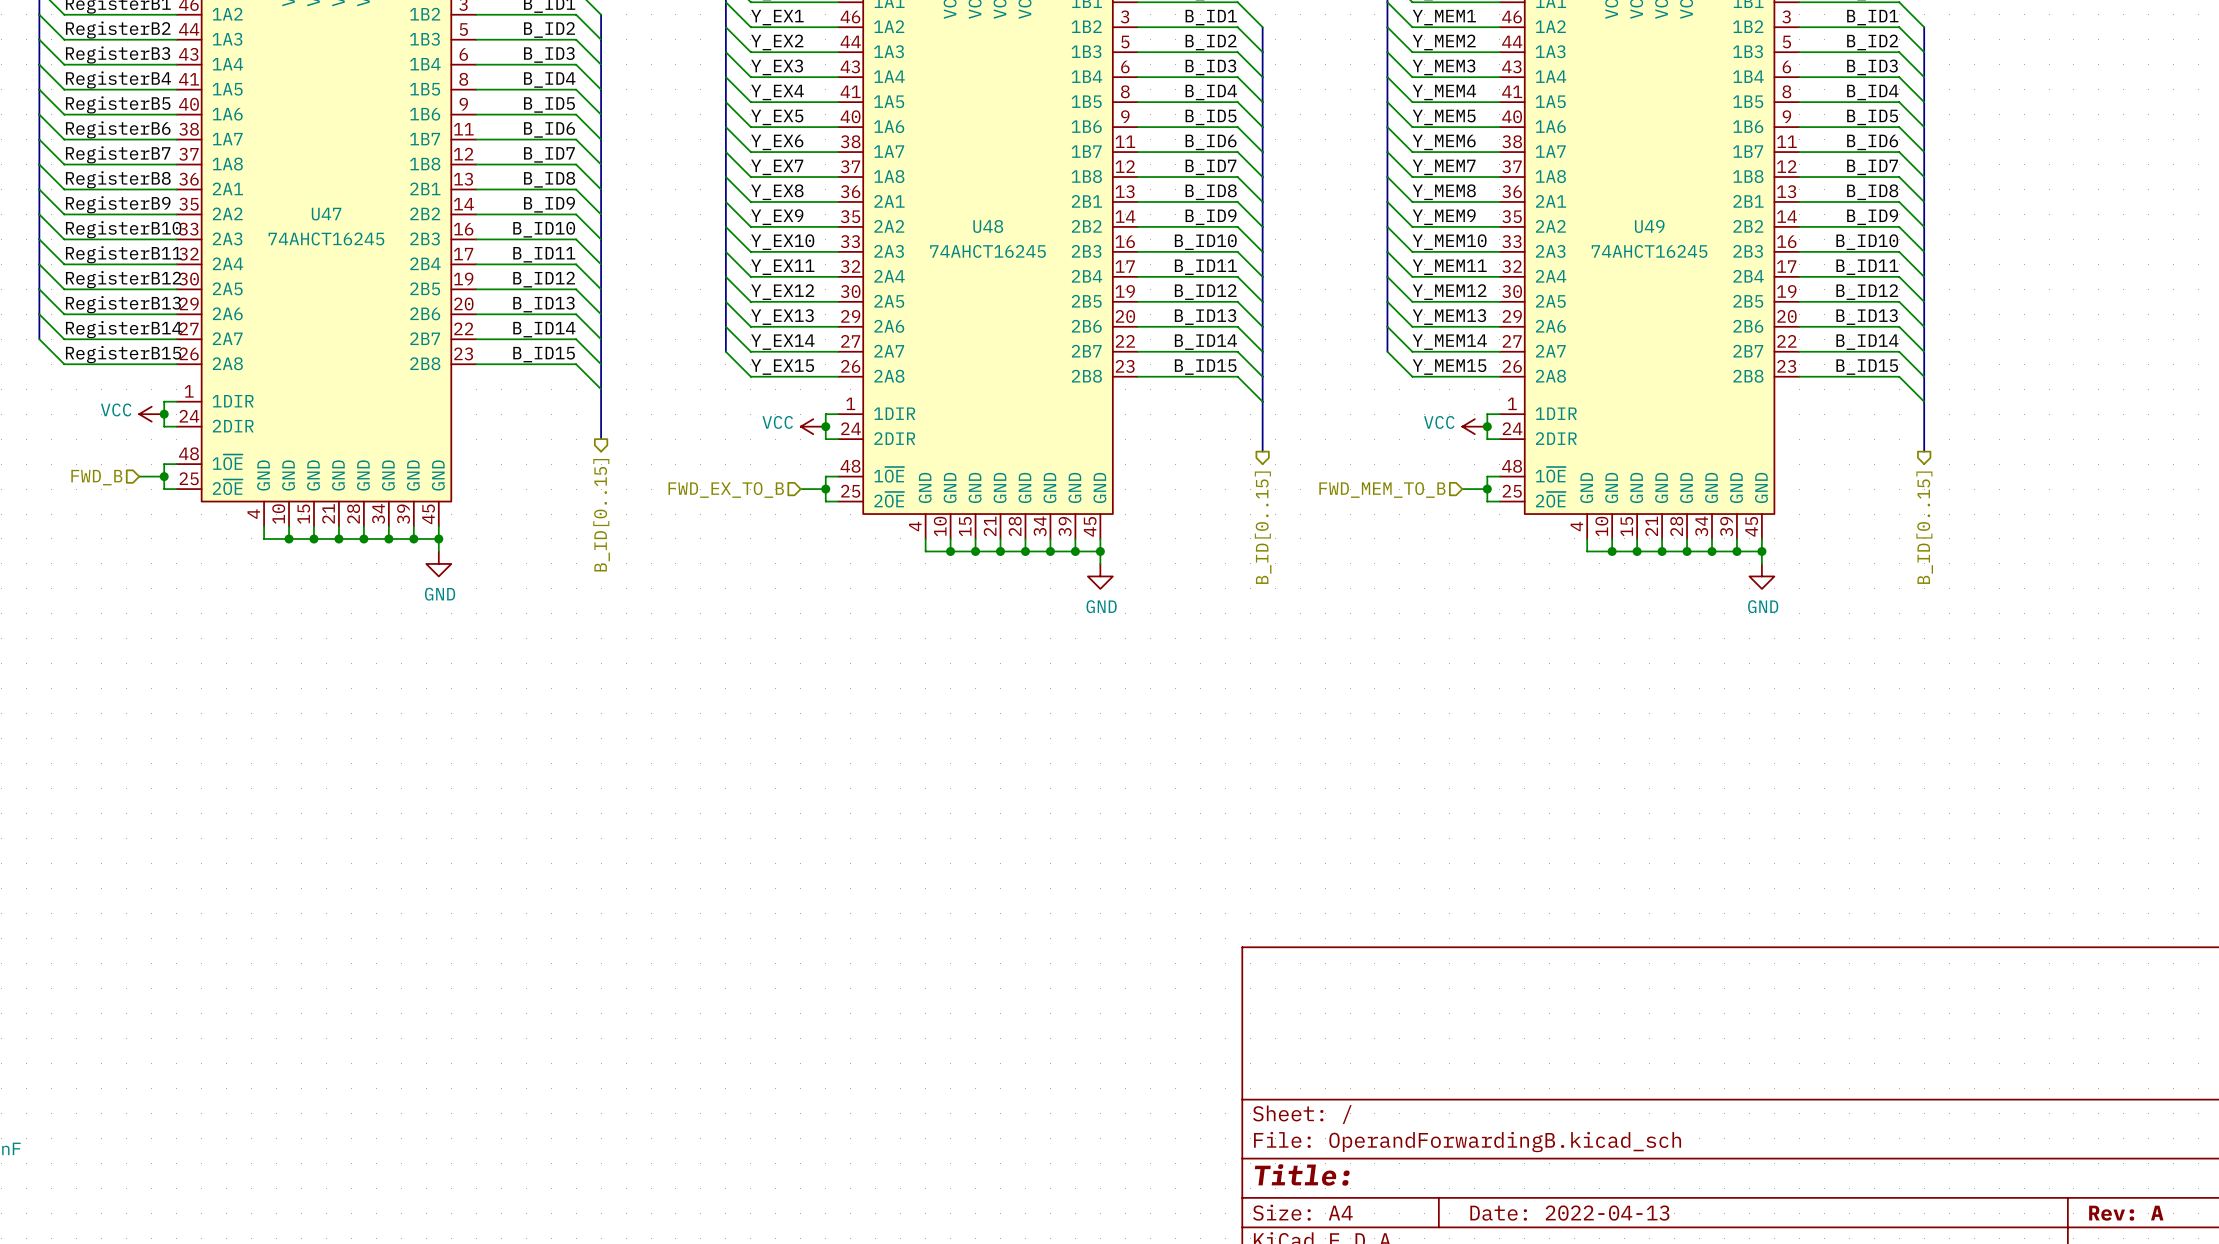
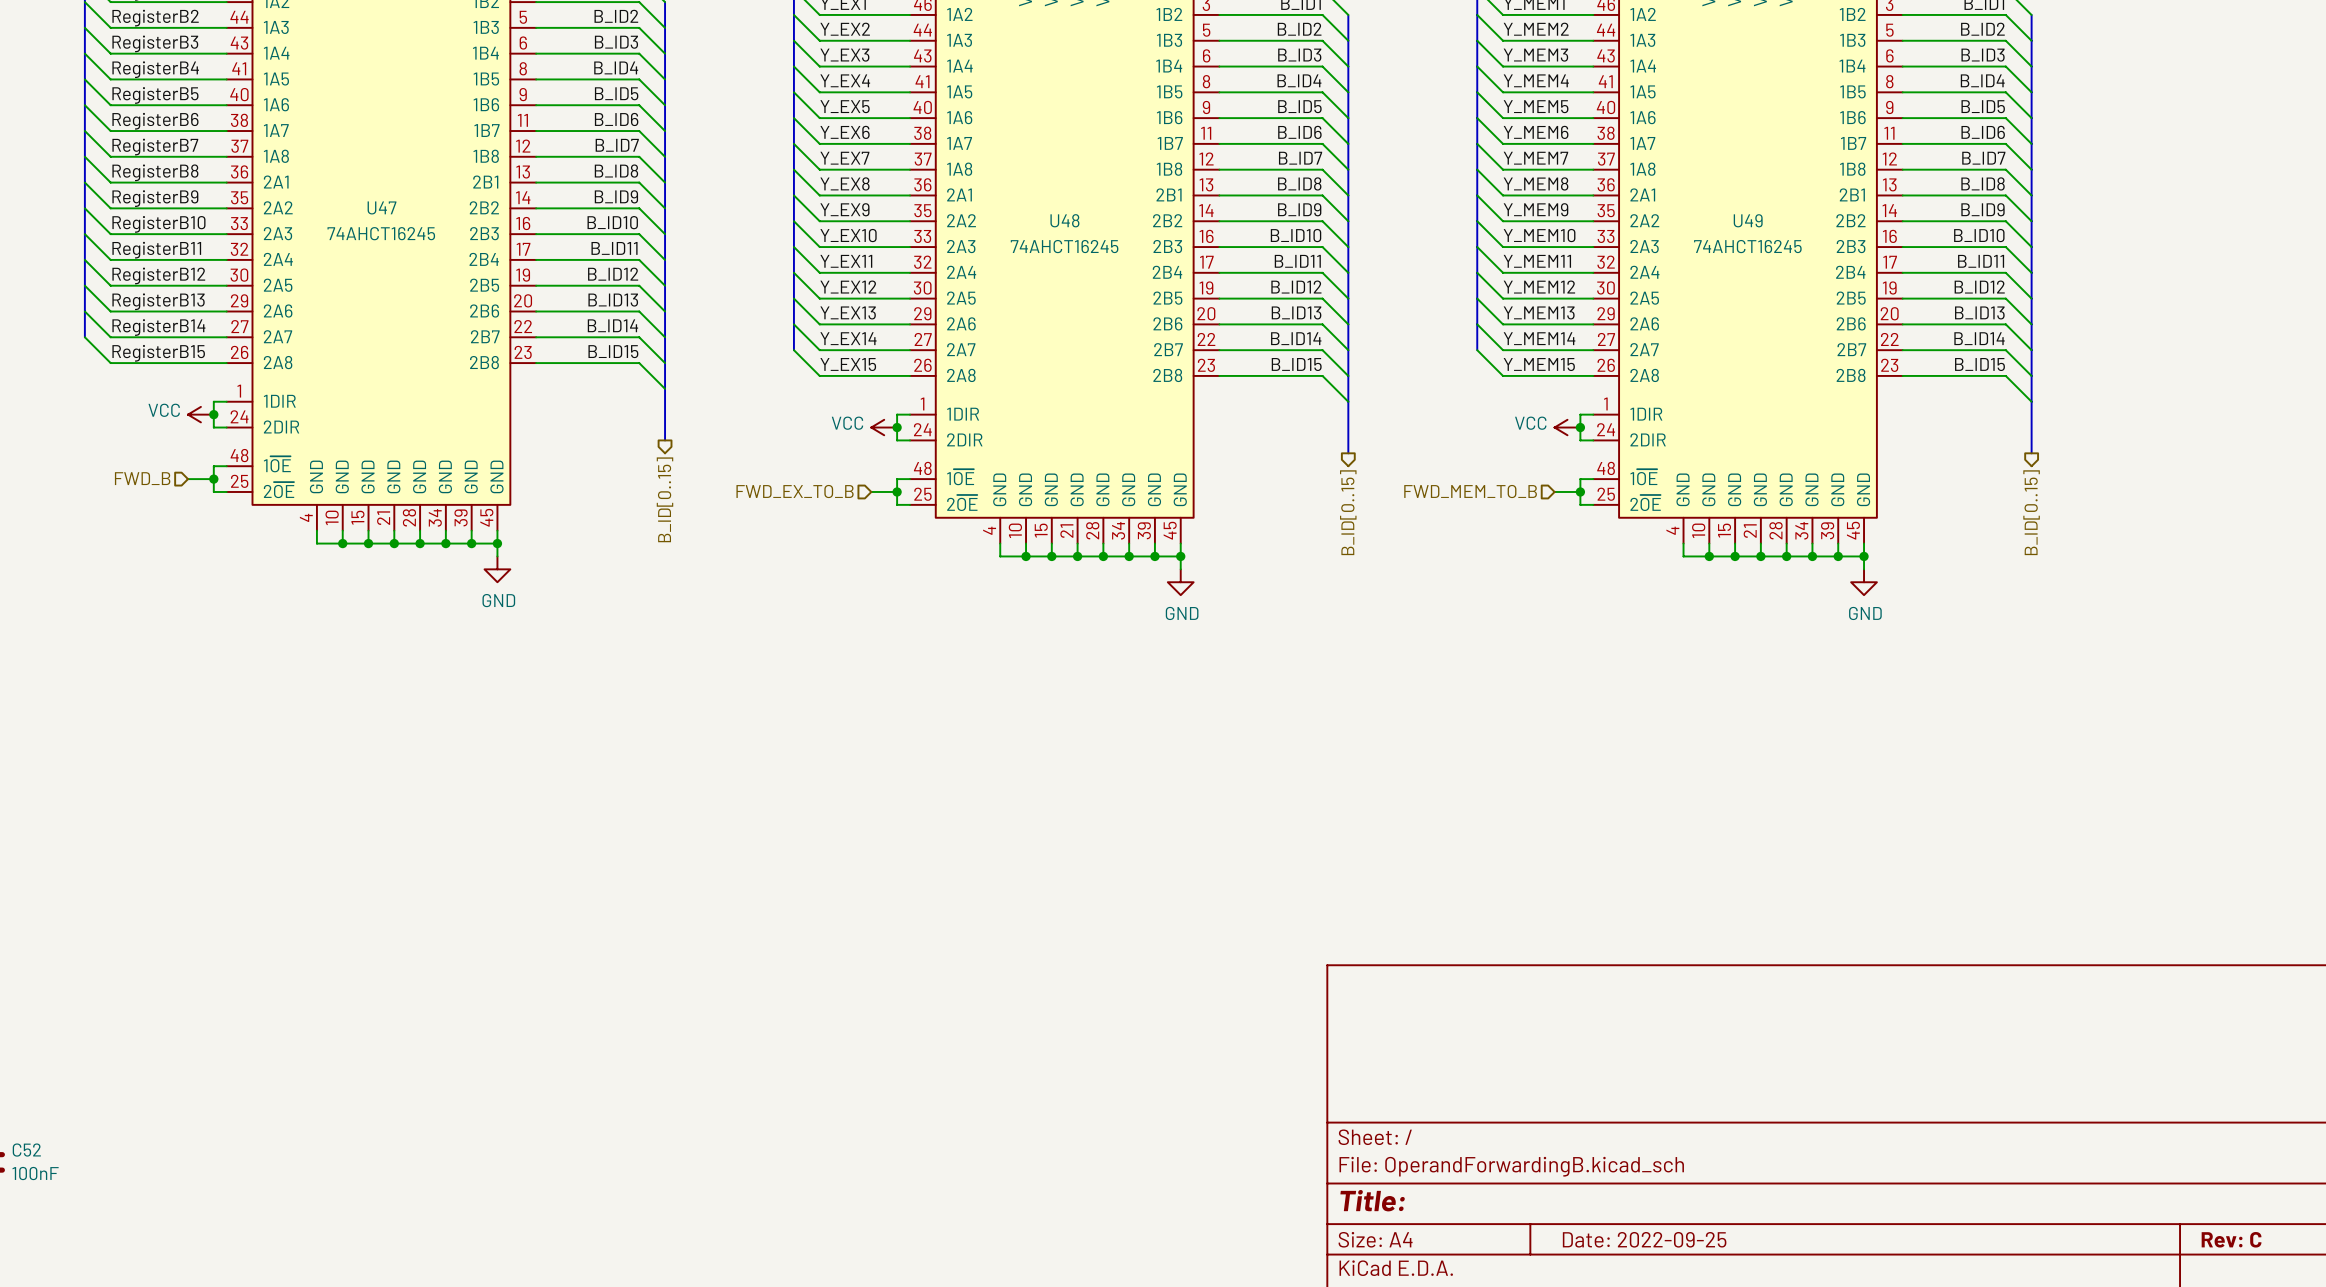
title block: Date: 2022-04-13 (1569, 1213) -> Date: 2022-09-25 (1644, 1239)
title block: Rev: A (2126, 1213) -> Rev: C (2231, 1239)

